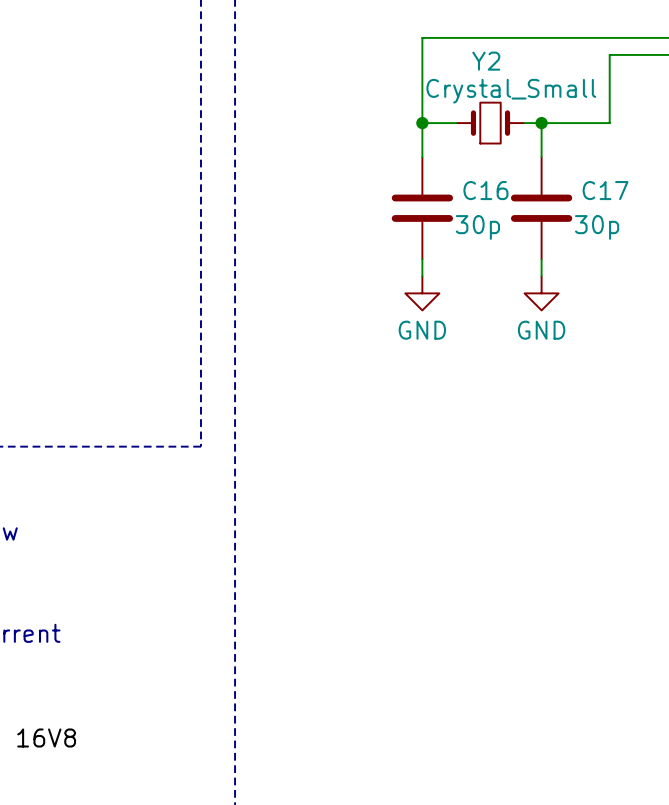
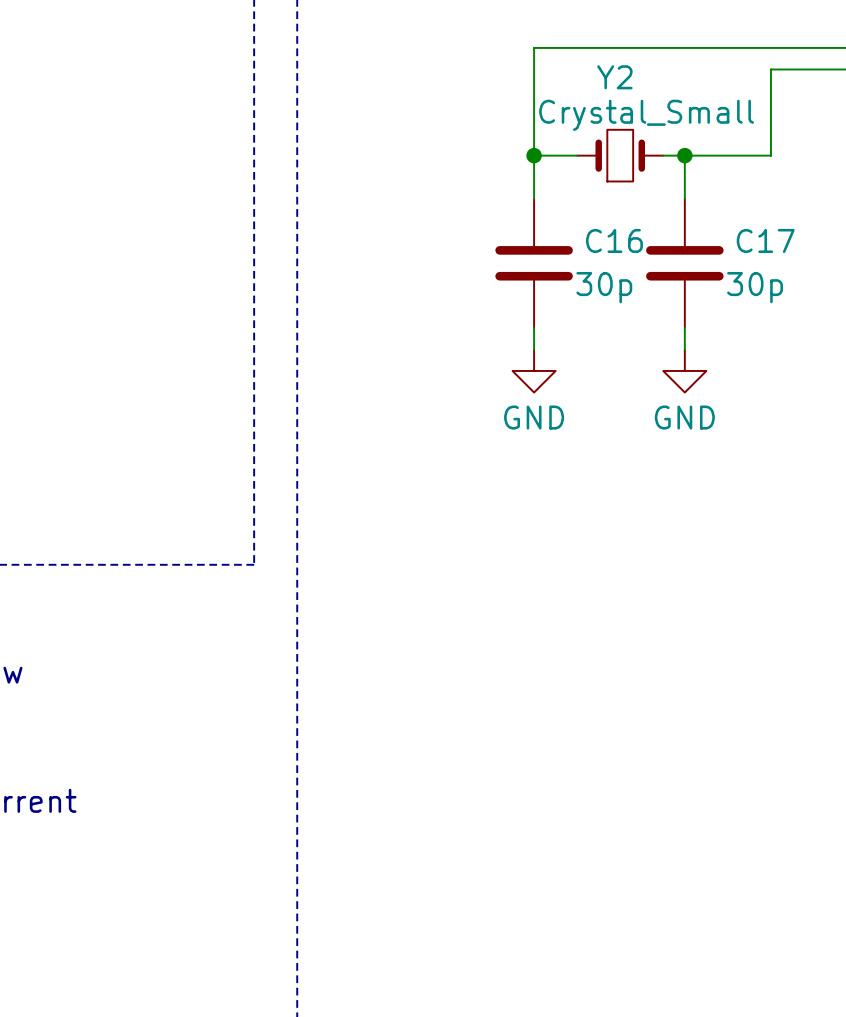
label: 16V8 (46, 738) -> none

